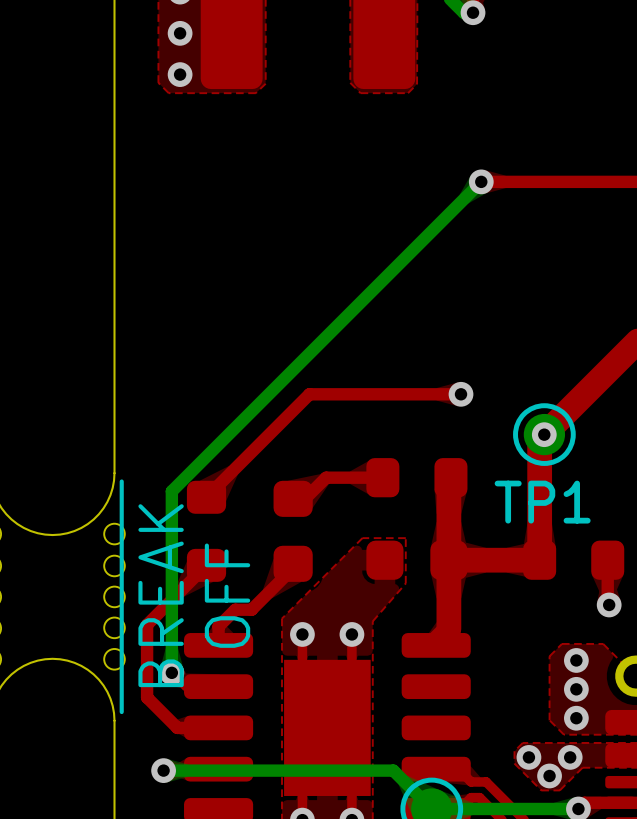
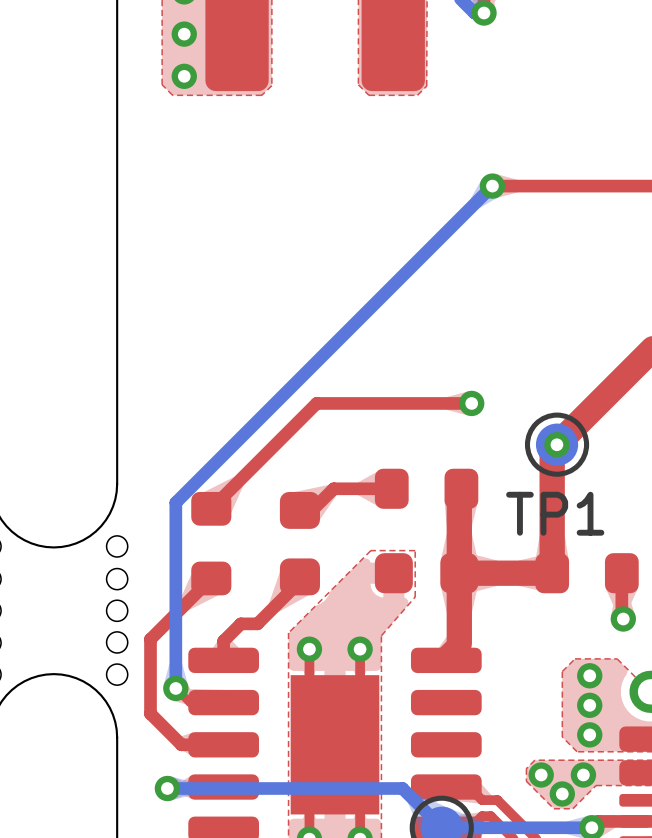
line: (121, 481) (121, 712) -> none
text: BREAK (161, 595) -> none
text: OFF (227, 595) -> none

